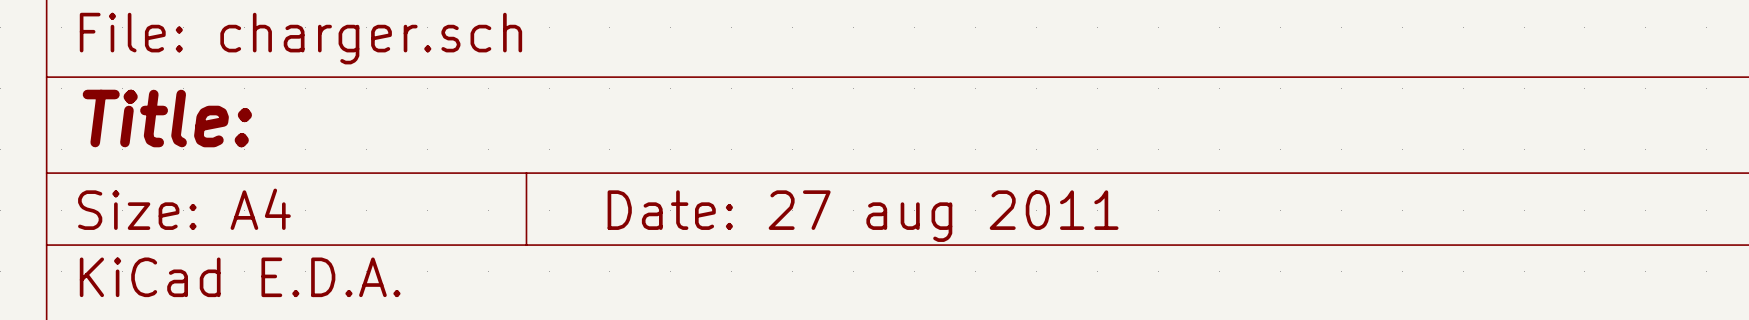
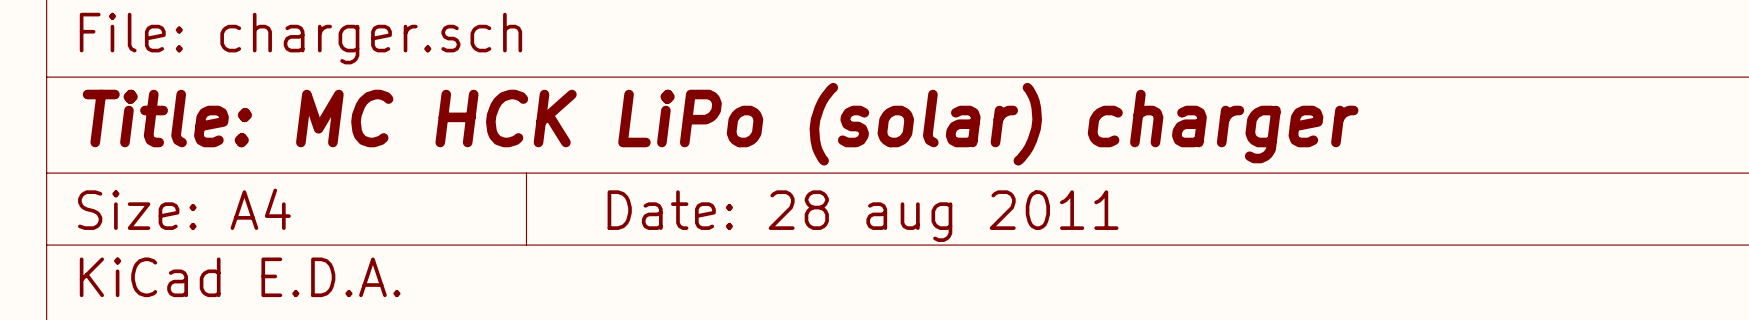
title block: Title: (167, 118) -> Title: MC HCK LiPo (solar) charger (720, 124)
title block: Date: 27 aug 2011 (863, 216) -> Date: 28 aug 2011 (863, 216)

